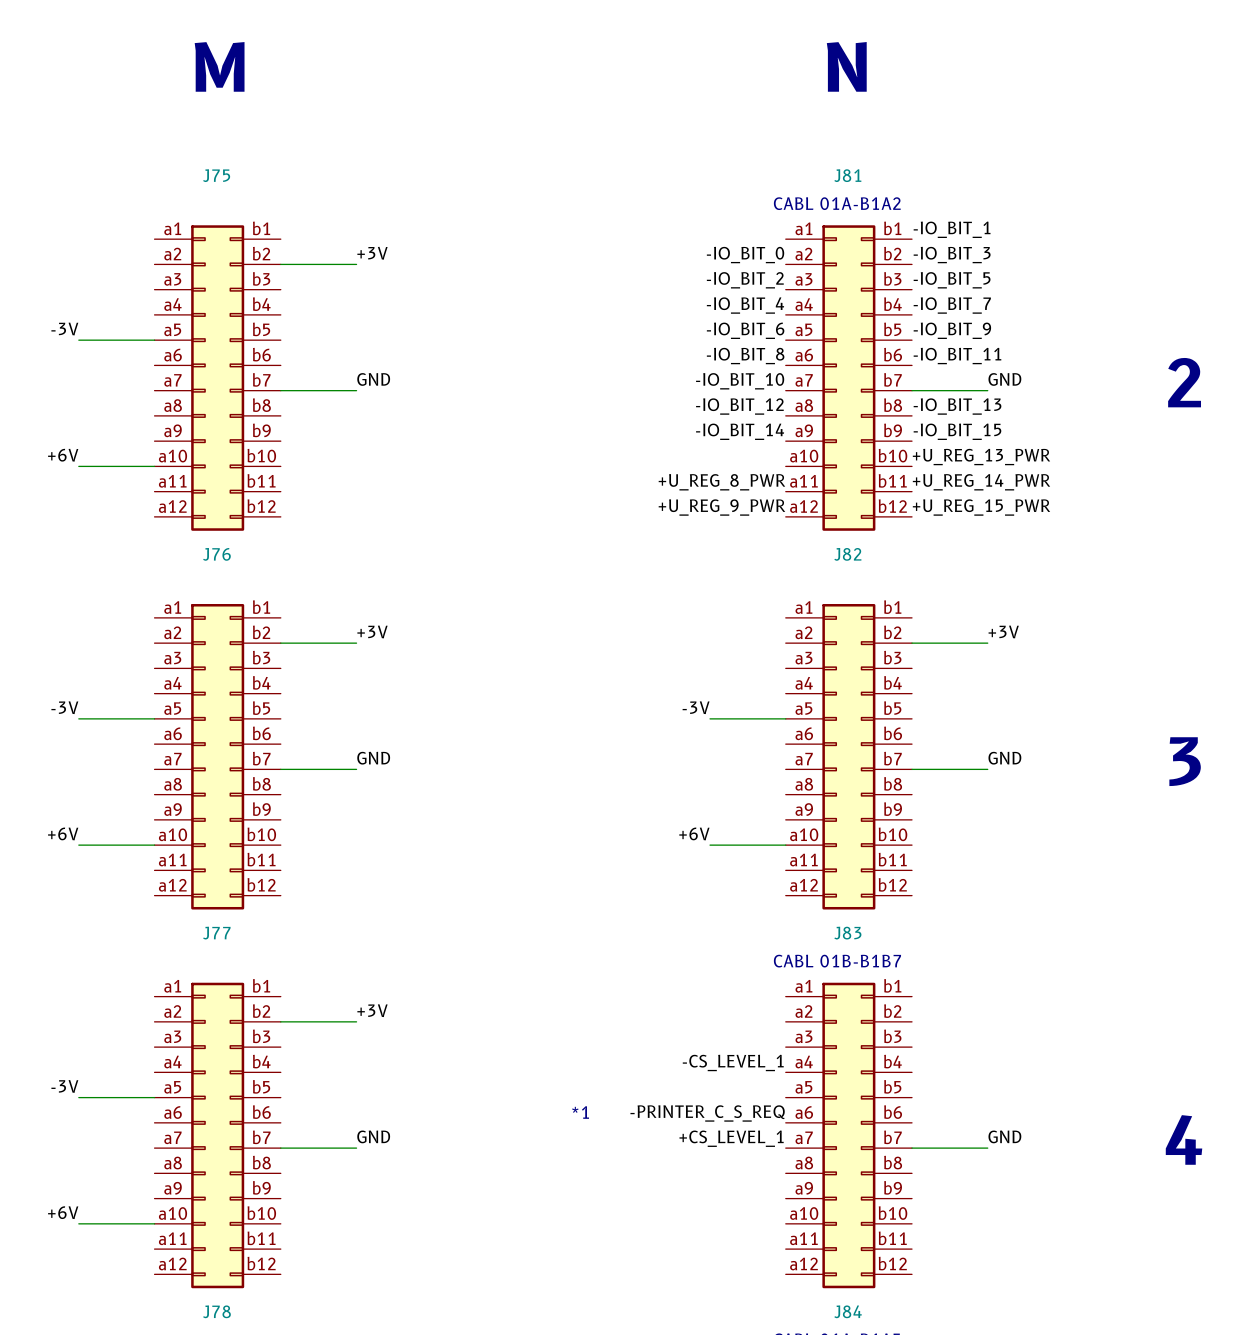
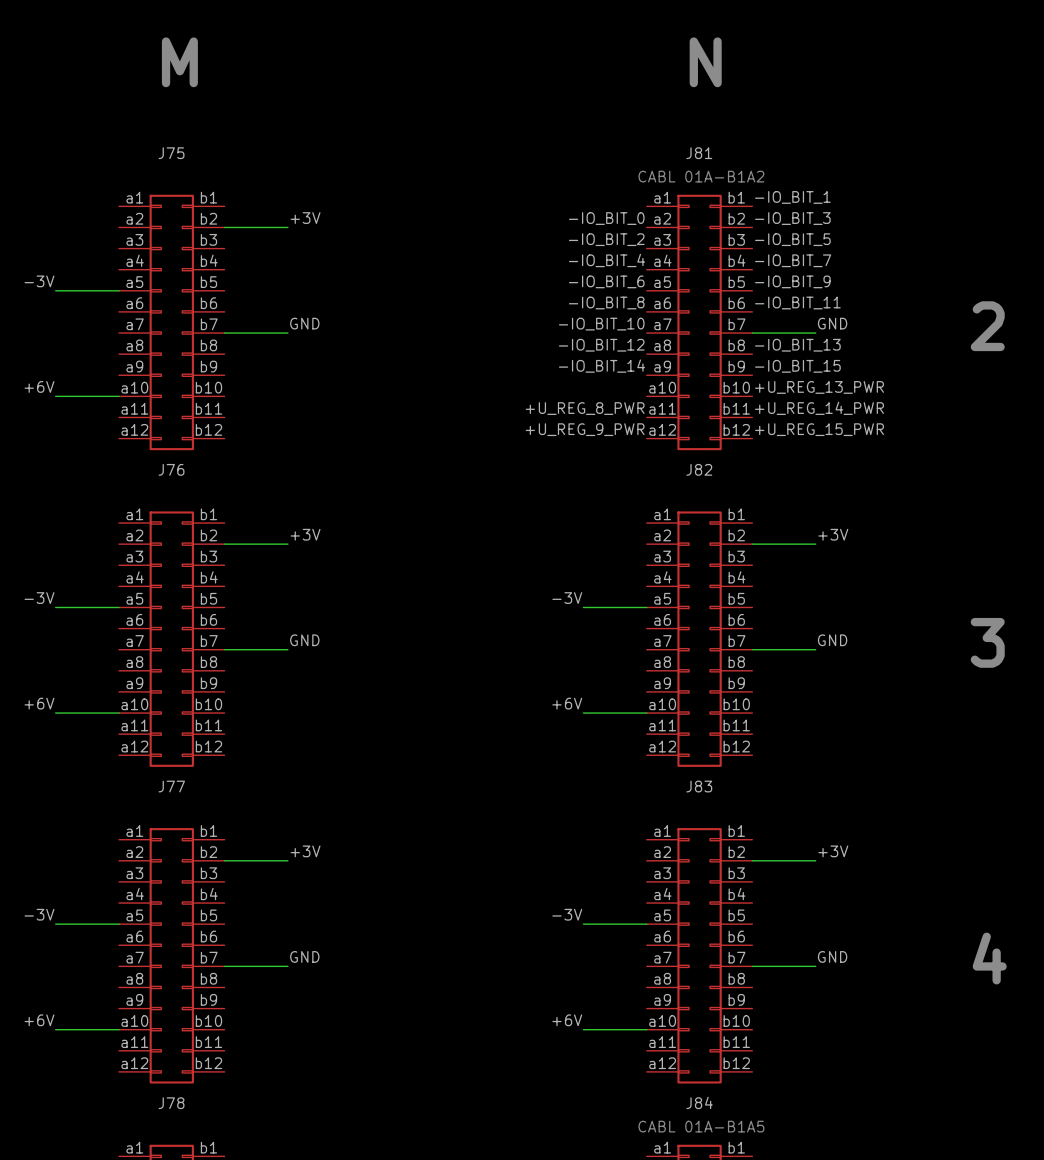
text: CABL 01B-B1B7 (837, 961) -> none
label: none -> +3V (833, 851)
wire: none -> (752, 860) (815, 860)
label: -CS_LEVEL_1 (733, 1062) -> none
label: none -> -3V (567, 914)
wire: none -> (583, 924) (646, 924)
text: *1 (580, 1112) -> none
label: -PRINTER_C_S_REQ (707, 1113) -> none
label: +CS_LEVEL_1 (731, 1138) -> none
label: none -> +6V (567, 1020)
wire: none -> (583, 1029) (646, 1029)

